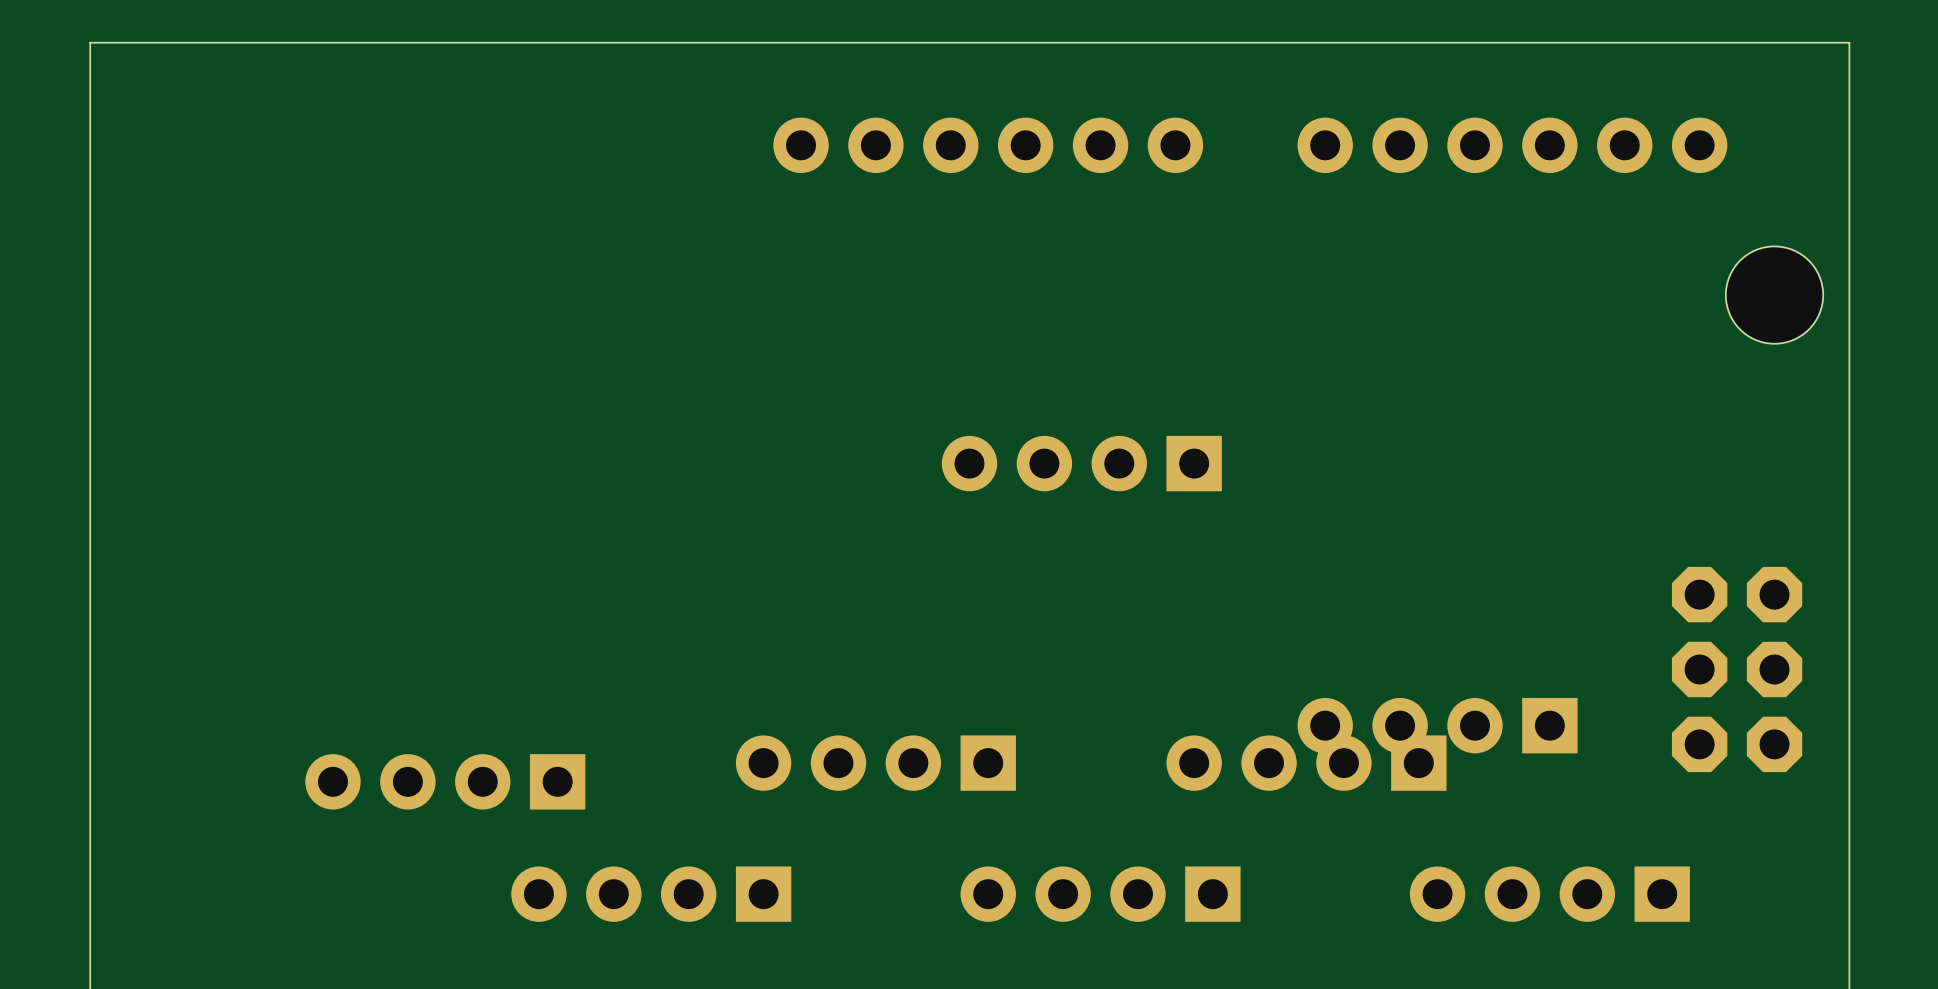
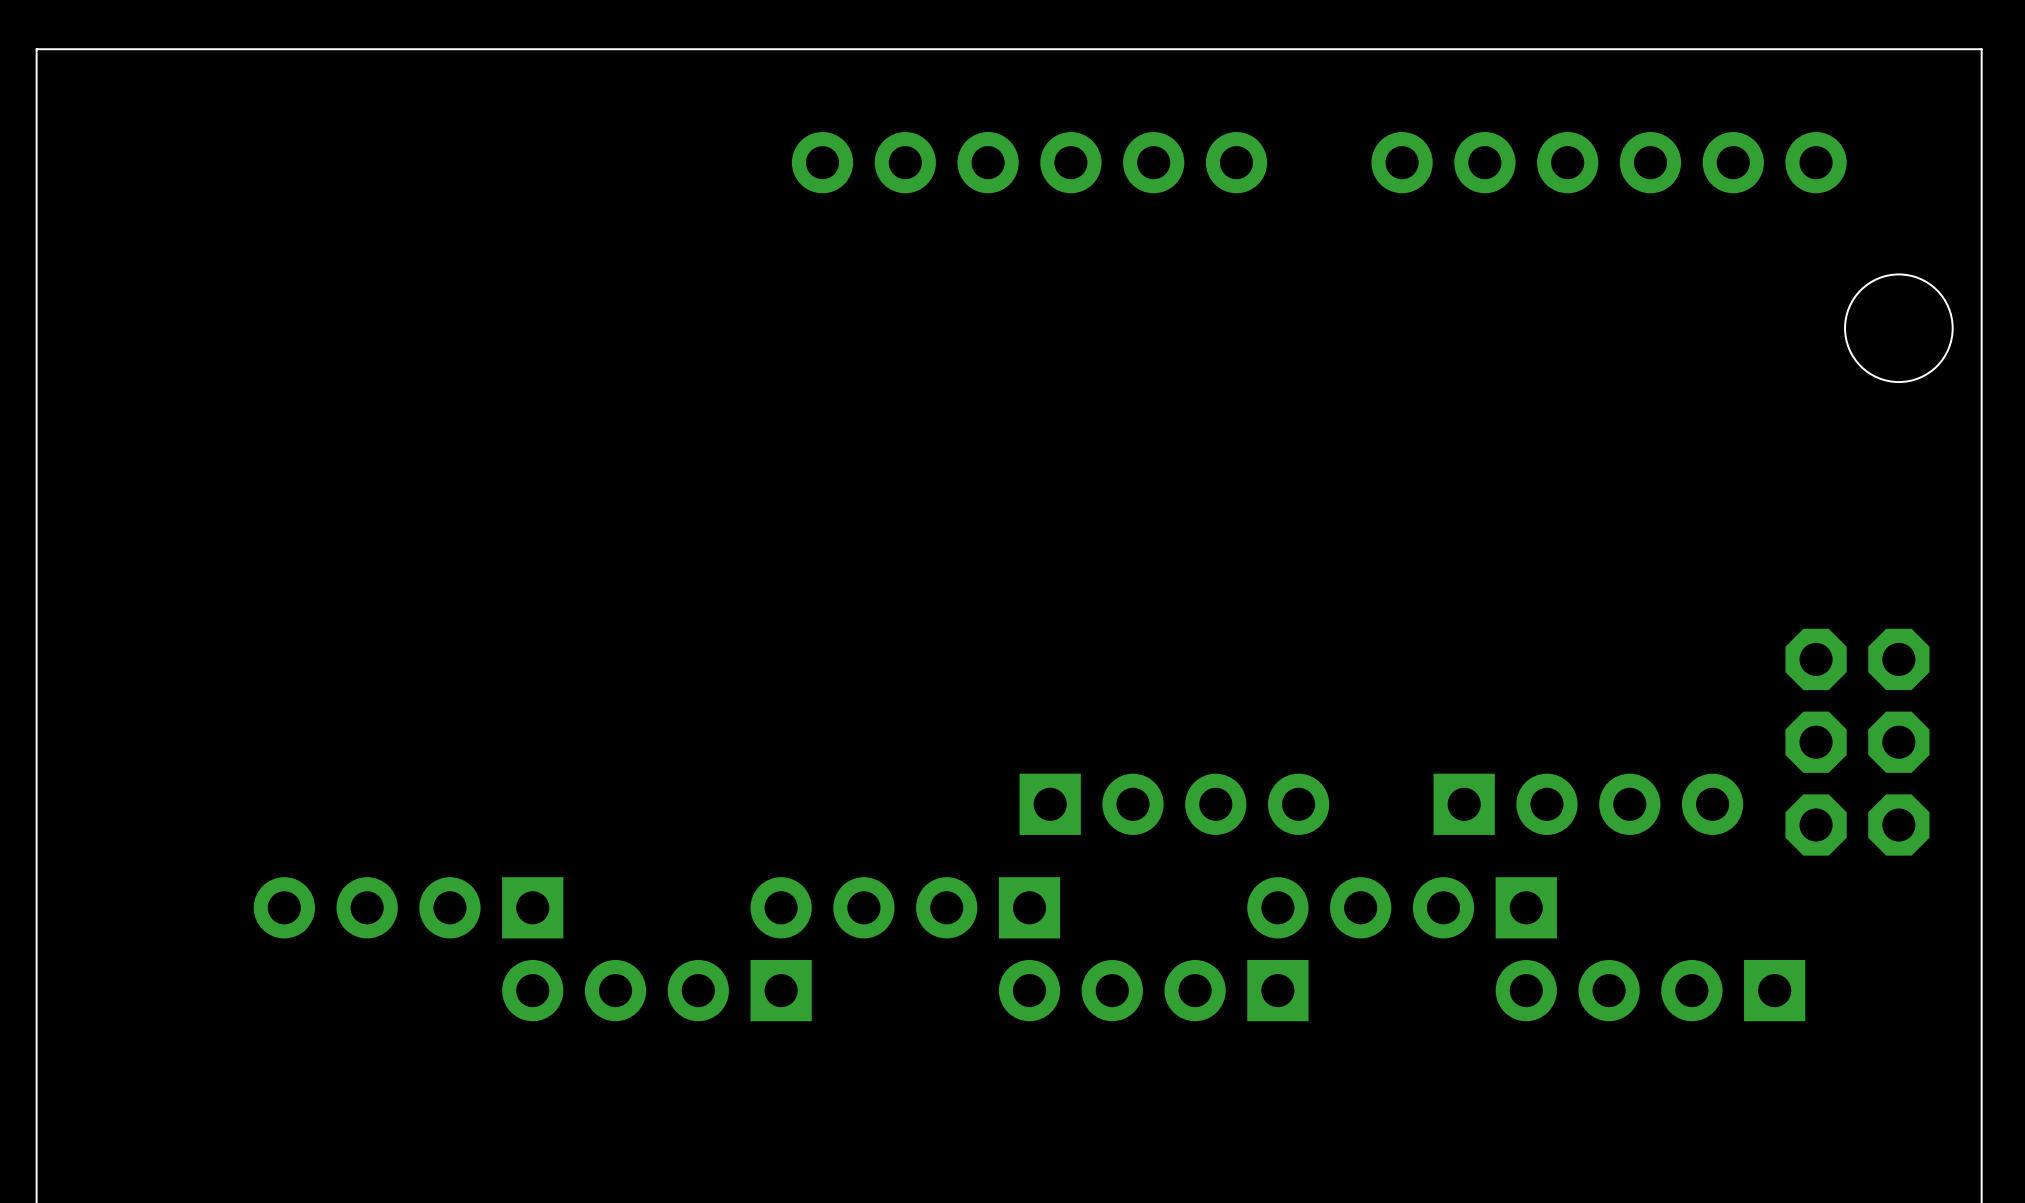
part: (1081, 463) -> none
part: none -> (1174, 804)
part rotation: 0° (1437, 725) -> 180° (1588, 804)
part position: (875, 763) -> (905, 907)
part position: (1306, 763) -> (1402, 907)
part position: (445, 781) -> (408, 907)

